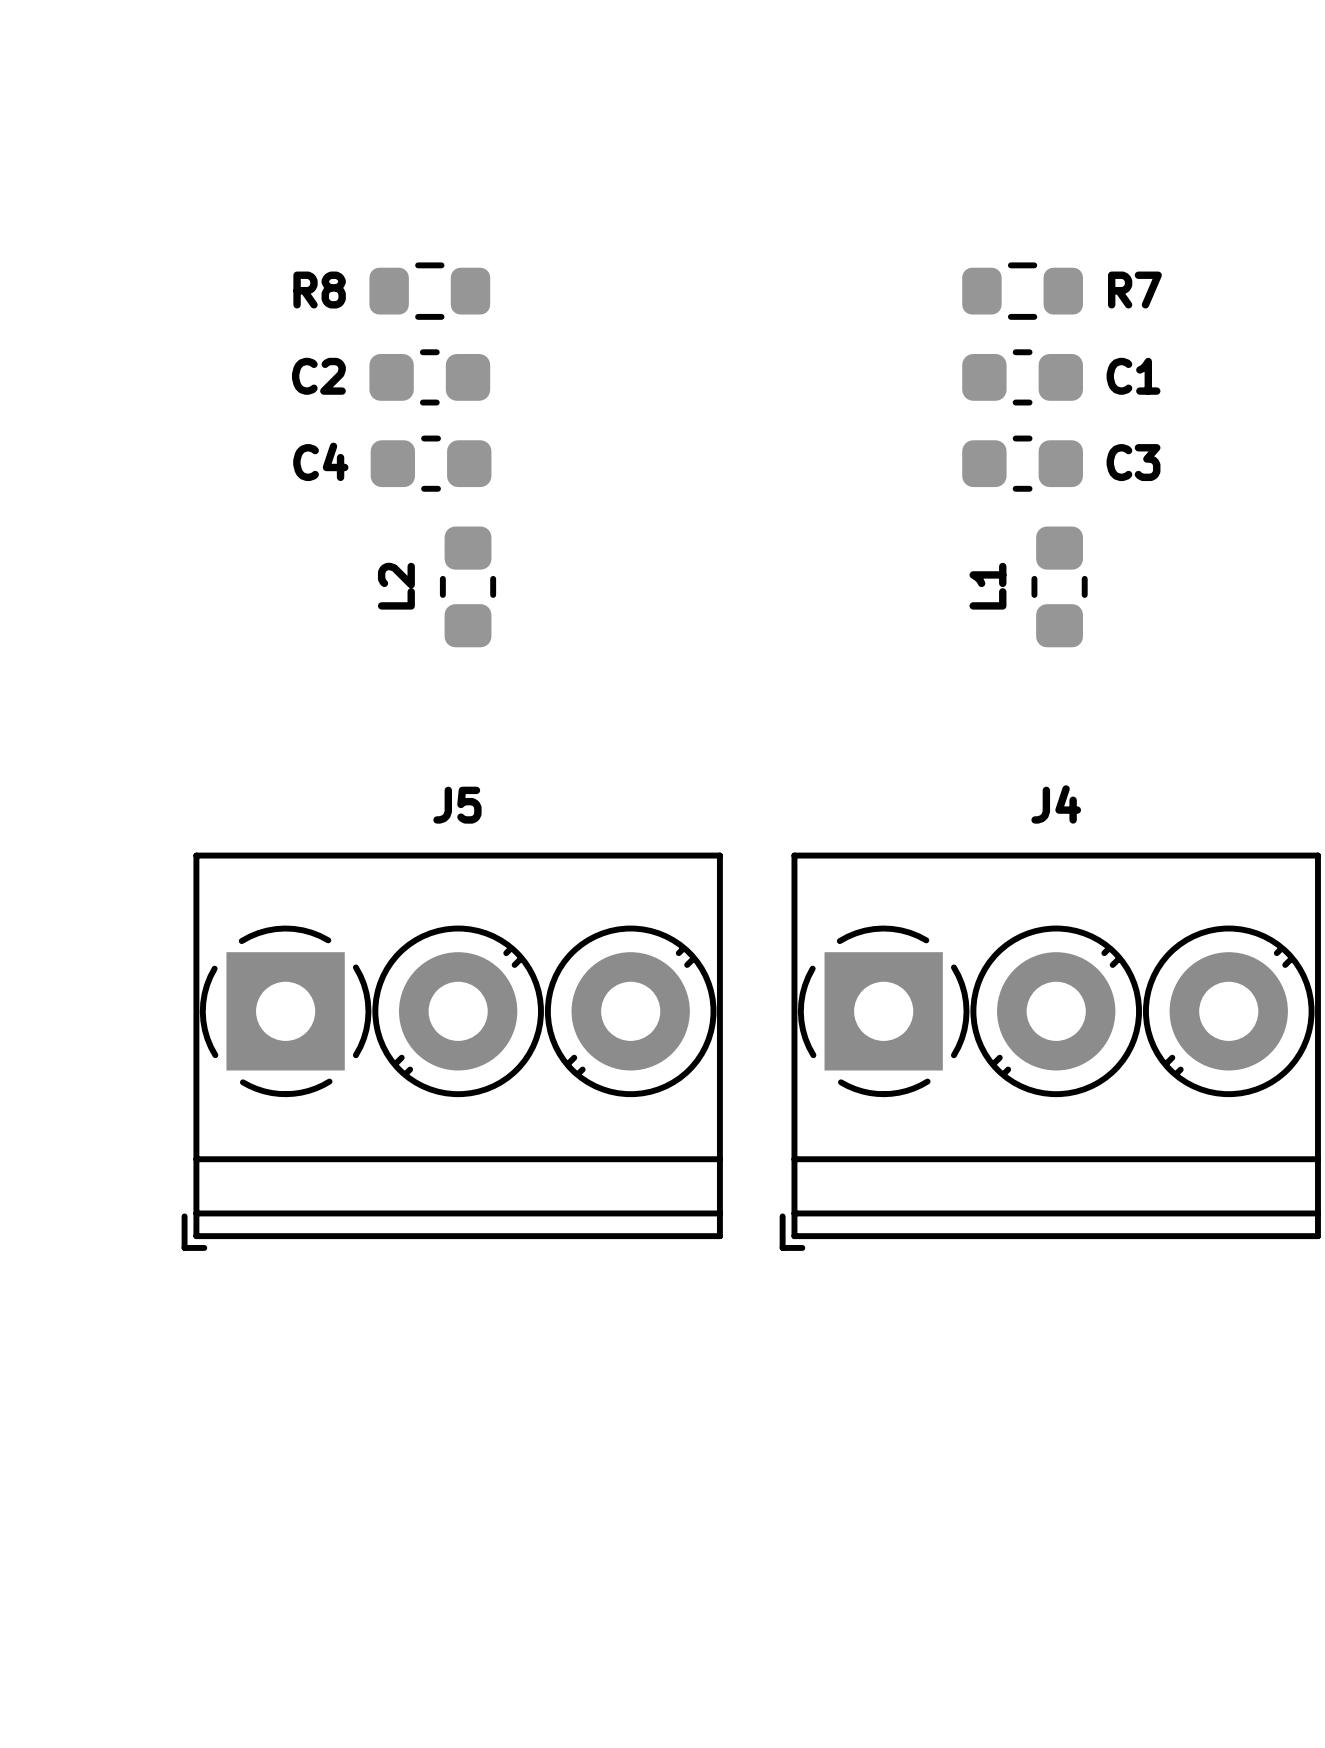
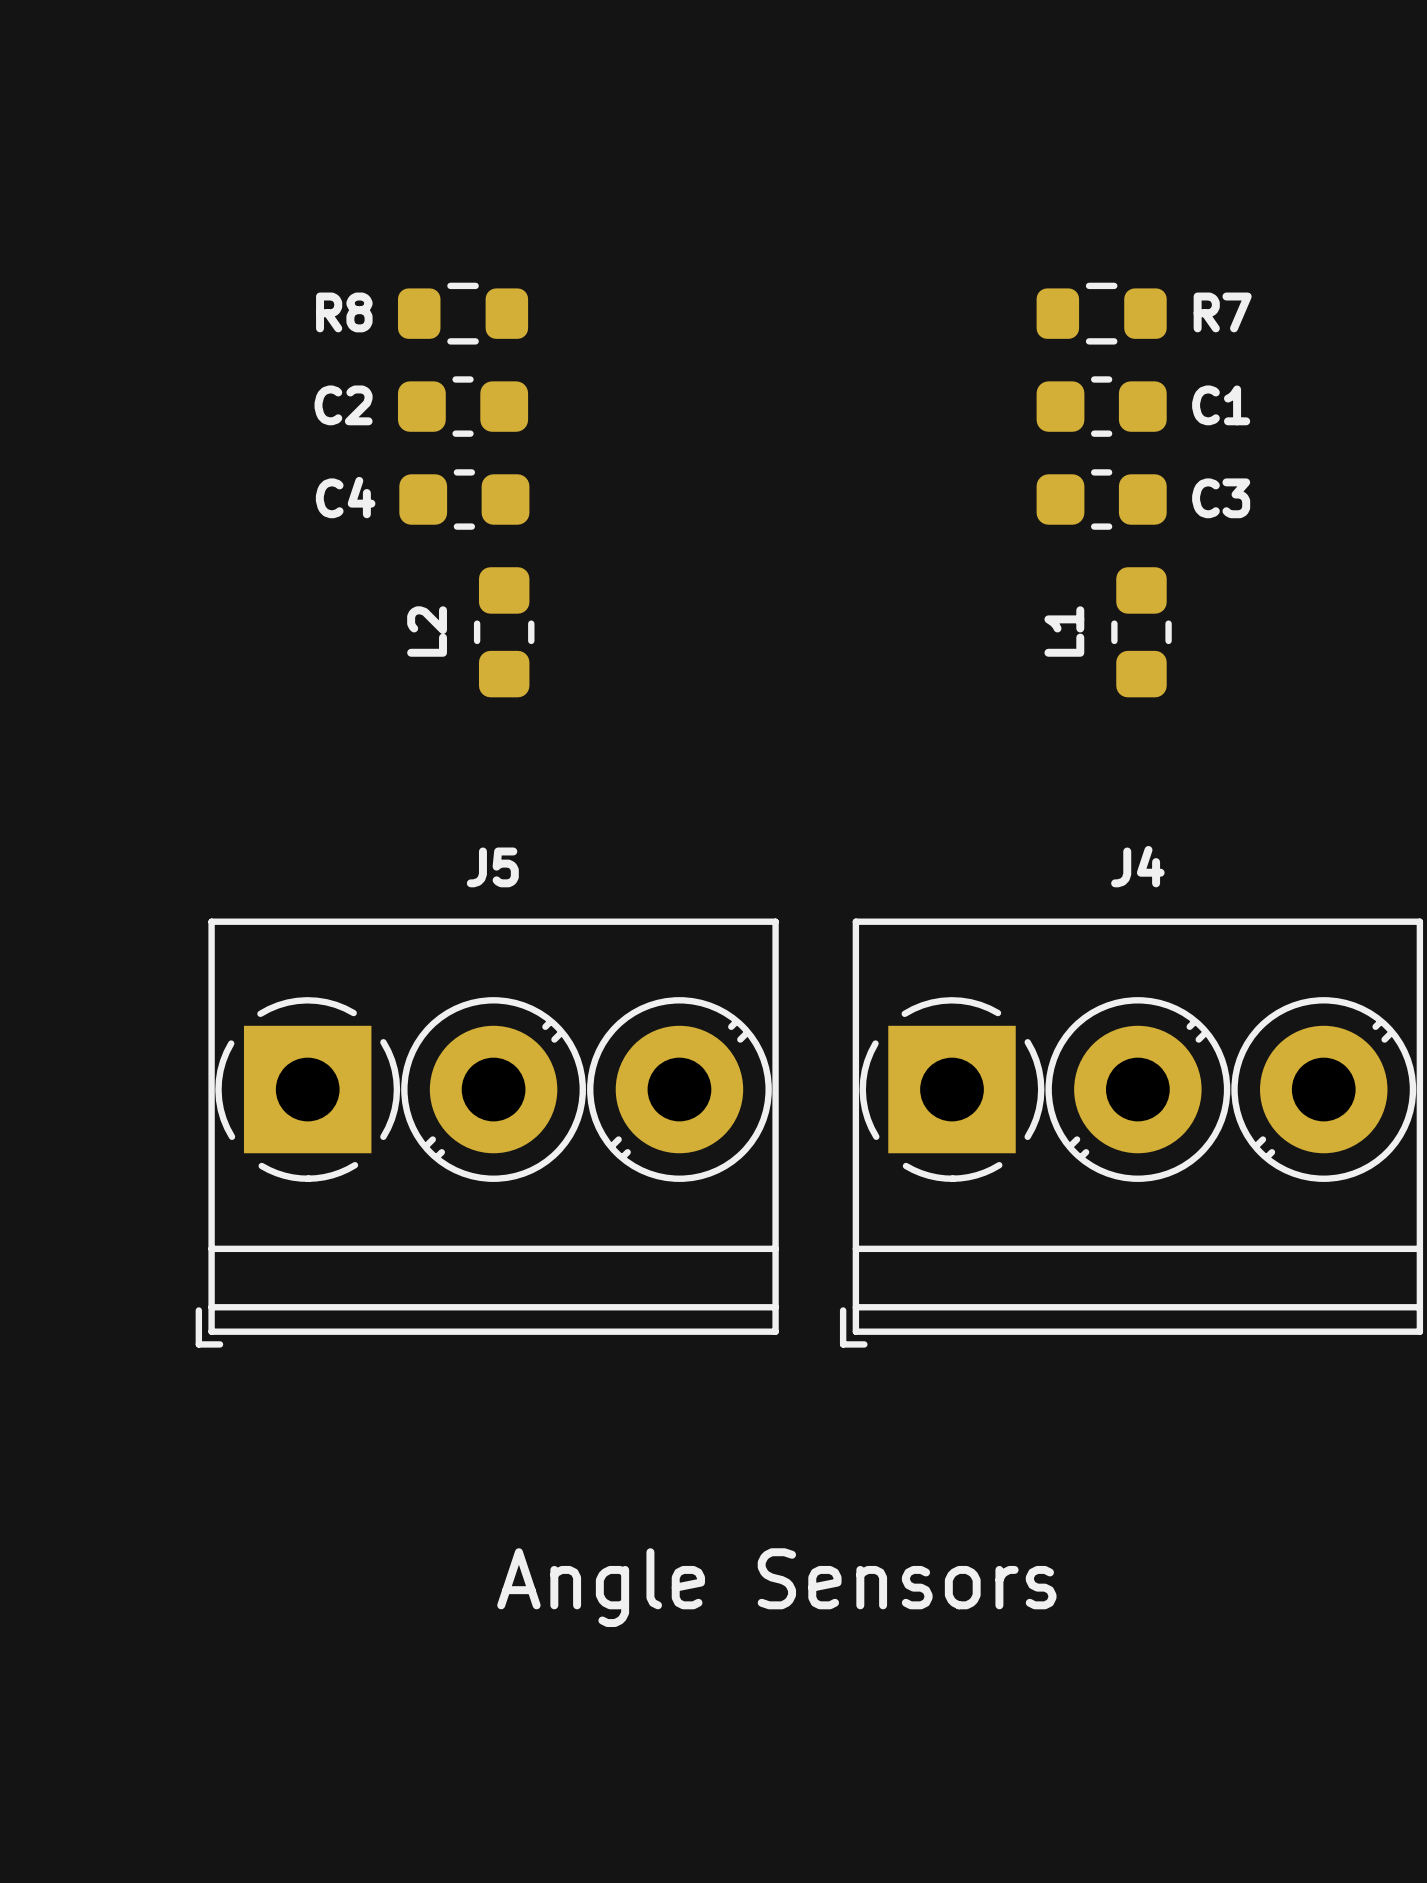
text: none -> Angle Sensors (776, 1587)

